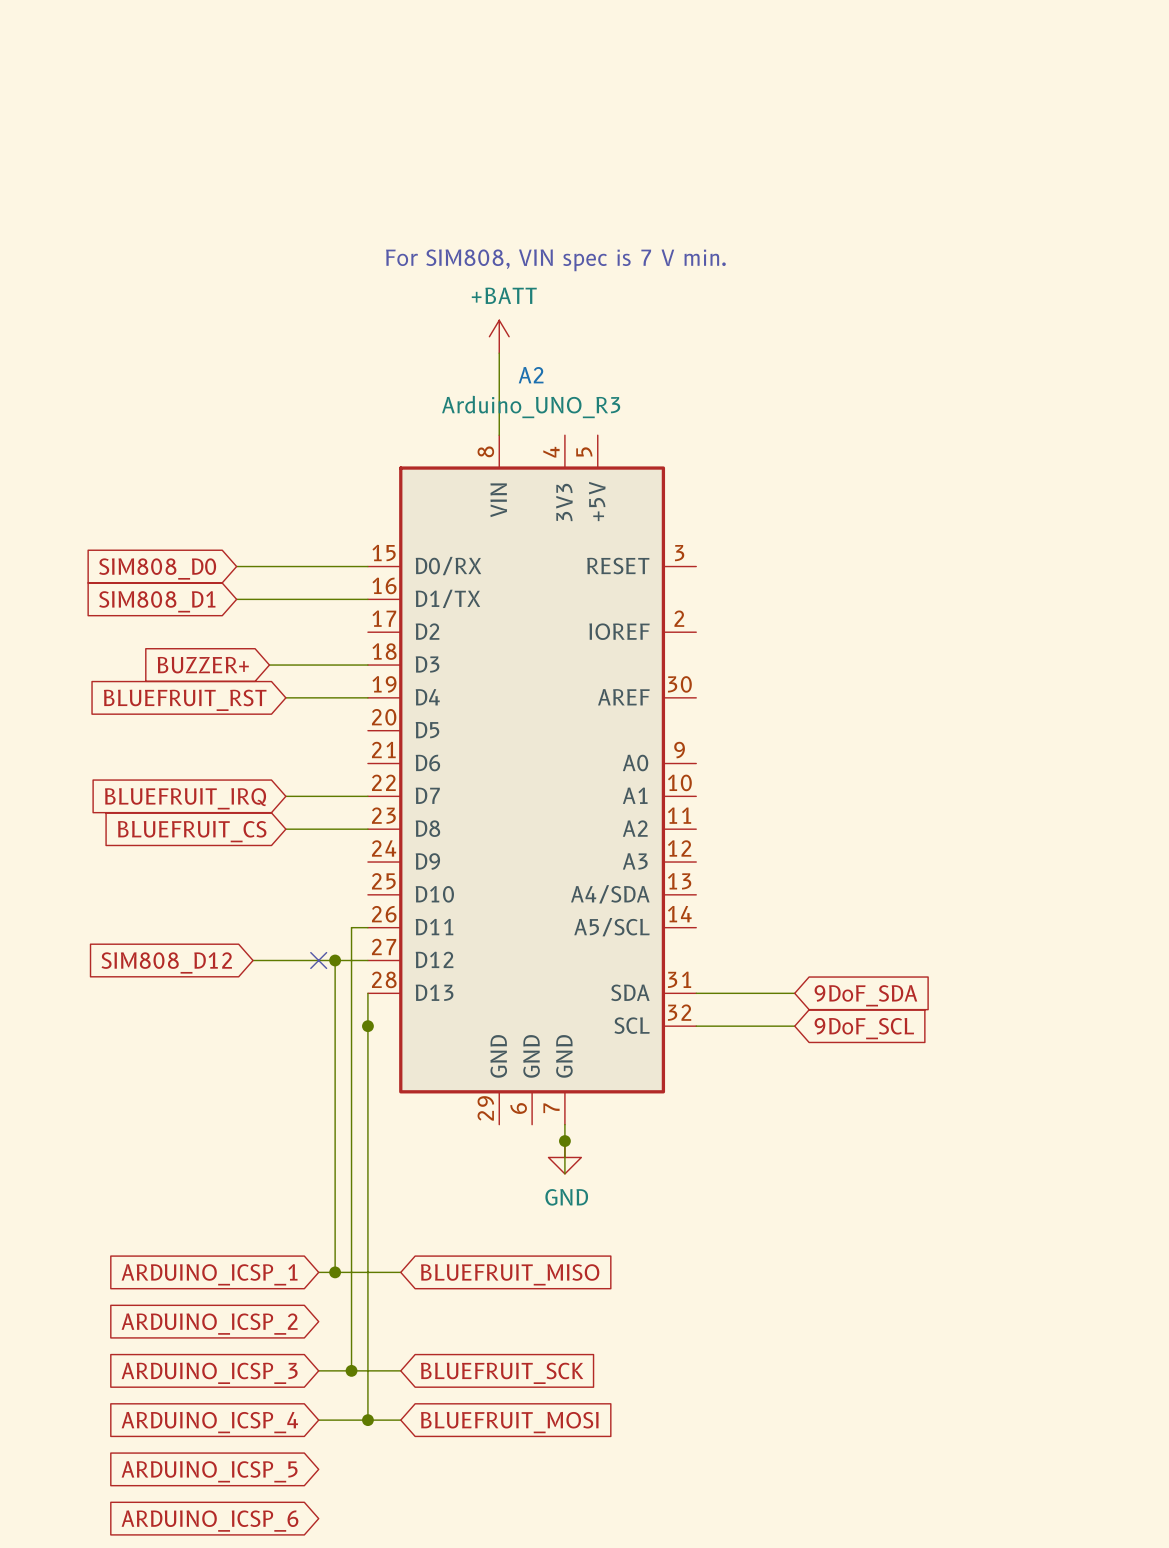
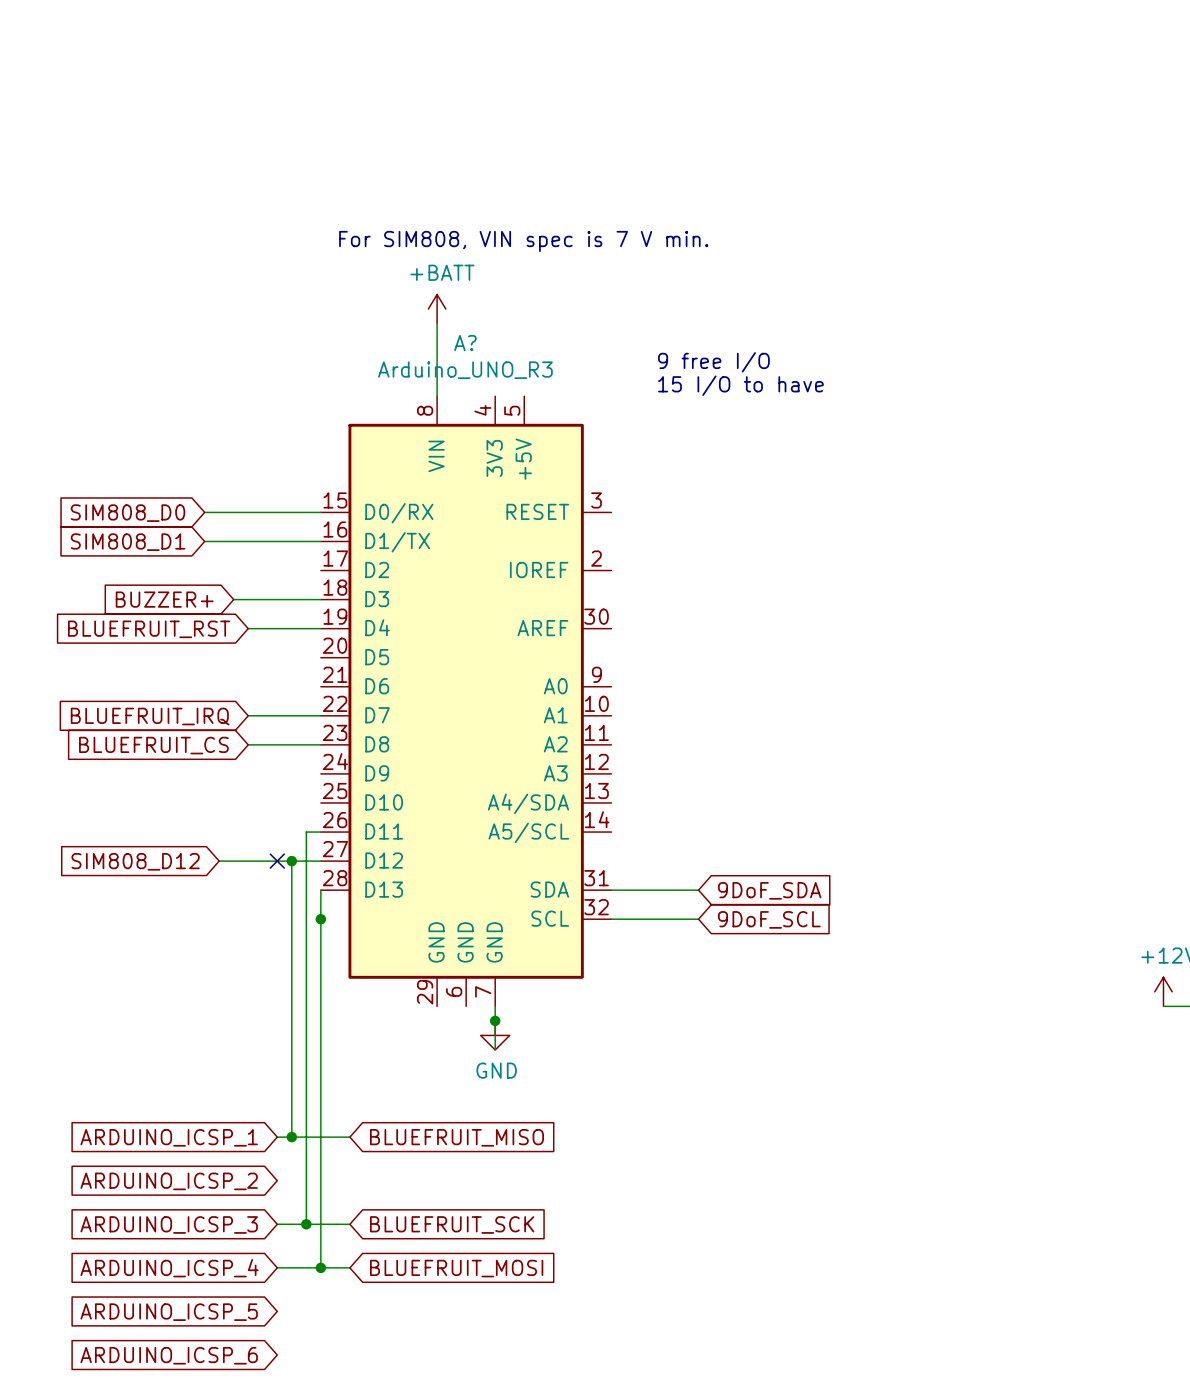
A2 name: A2 (531, 375) -> A? (465, 343)
text: none -> 9 free I/O (713, 362)
text: none -> 15 I/O to have (740, 385)

